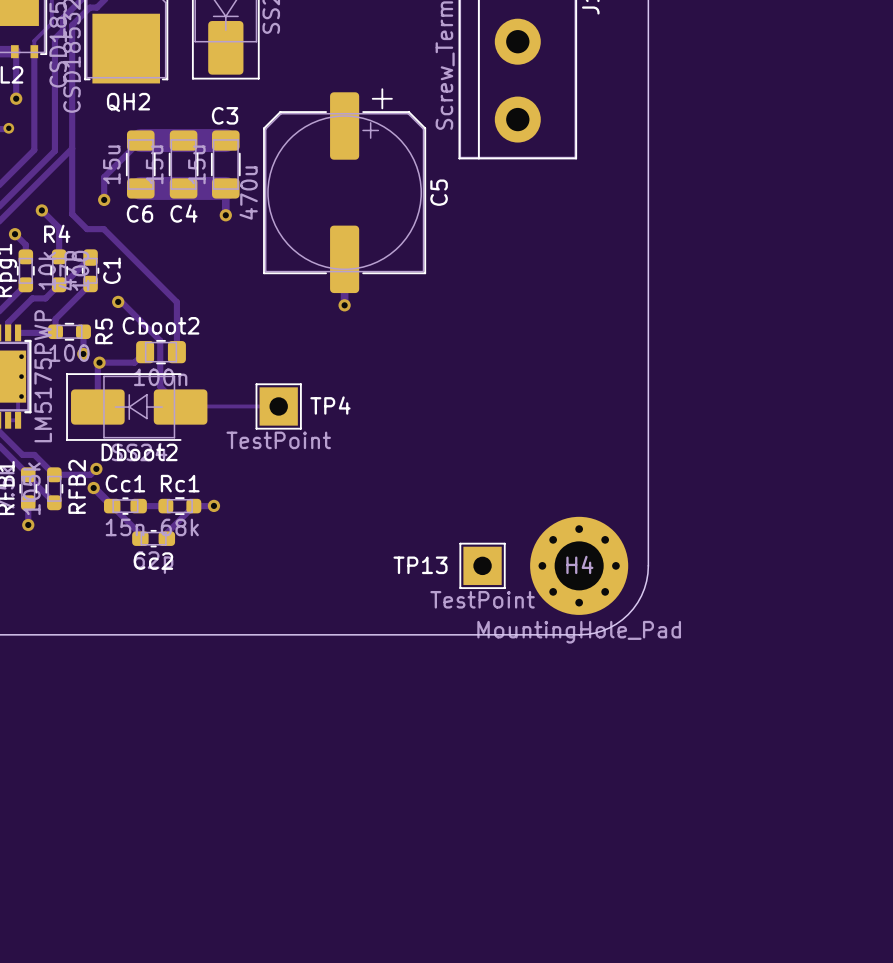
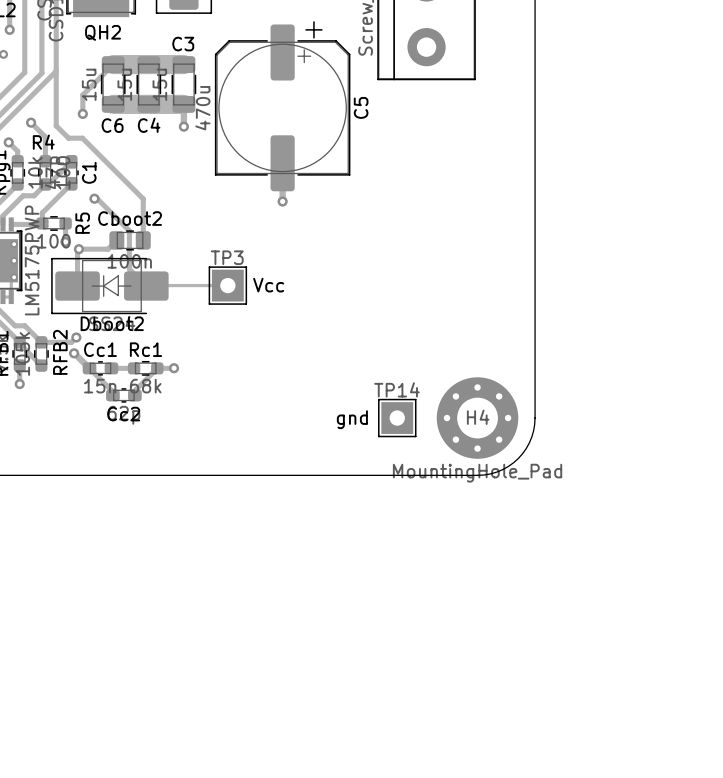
TP4 name: TP4 (330, 405) -> TP3 (227, 257)
TP4 value: TestPoint (278, 440) -> Vcc (268, 285)
TP13 name: TP13 (420, 565) -> TP14 (396, 389)
TP13 value: TestPoint (482, 599) -> gnd (352, 419)

